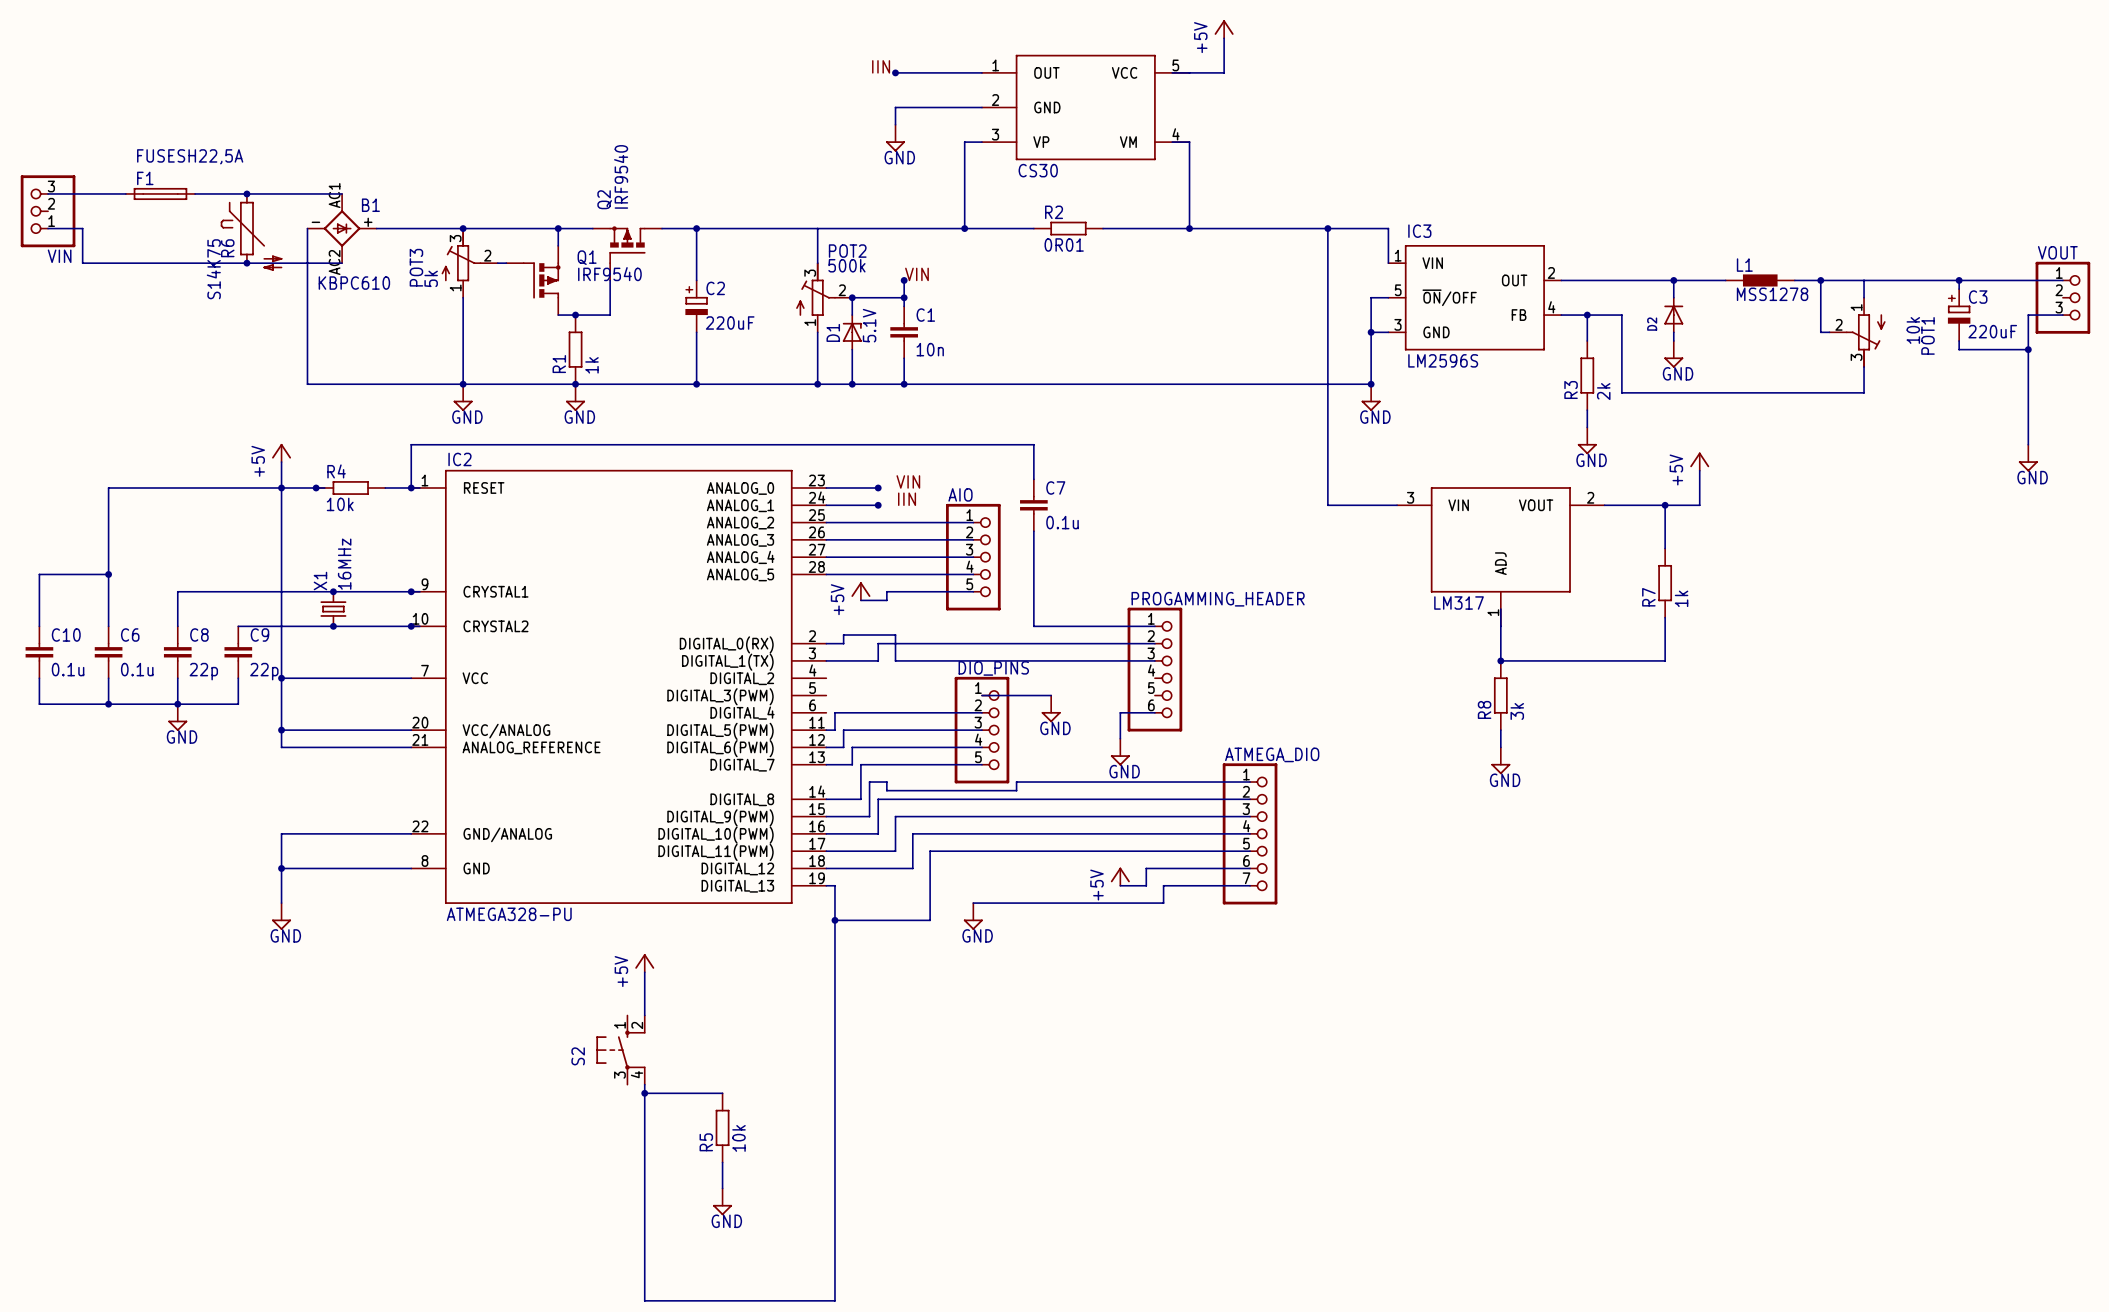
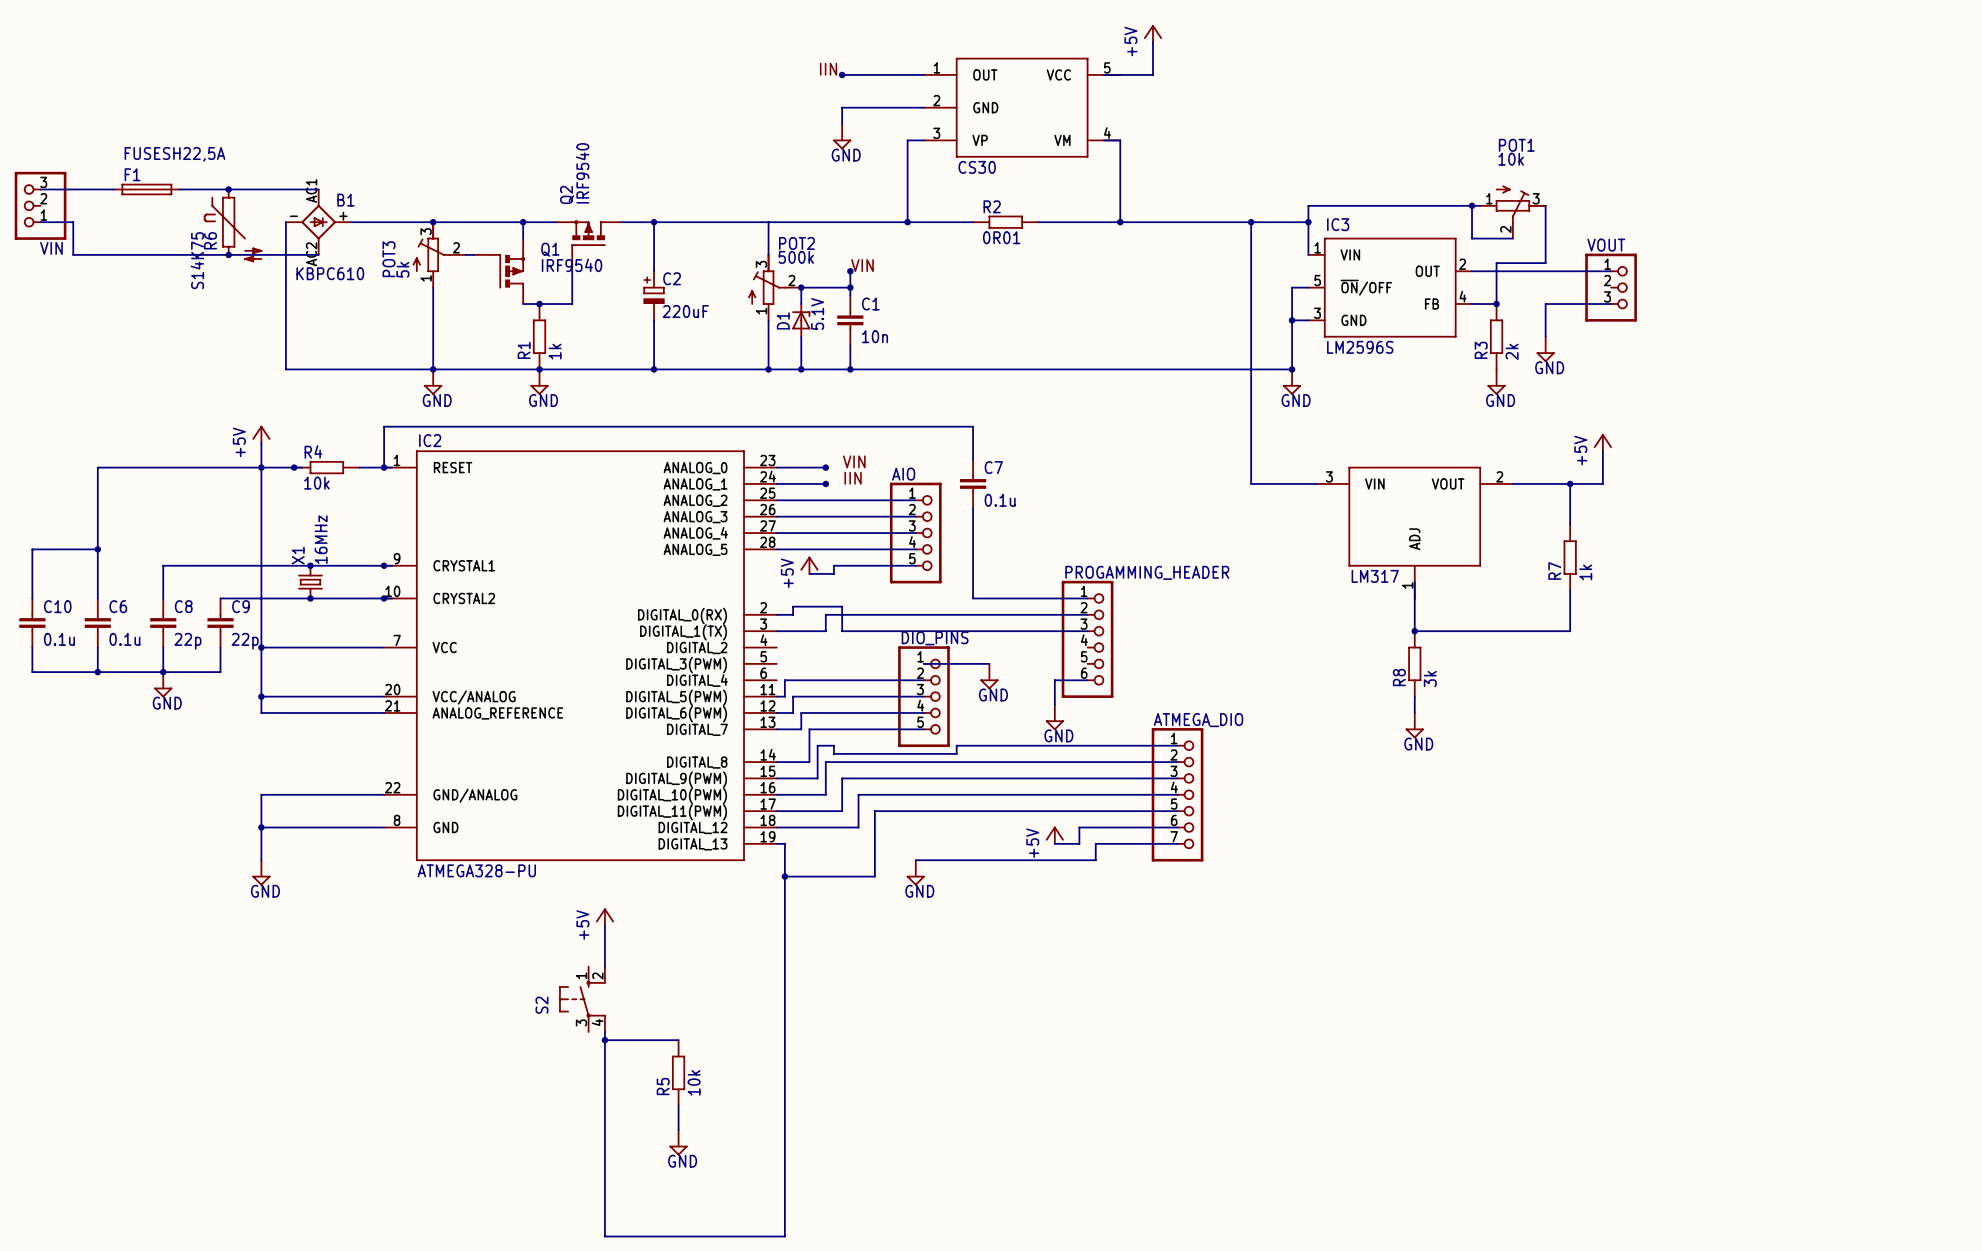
wire: none -> (1472, 205) (1472, 238) (1512, 238)
junction: none -> (1472, 205)
wire: none -> (1480, 205) (1308, 205) (1308, 222)
wire: none -> (1545, 205) (1545, 263) (1496, 263) (1496, 304)
junction: none -> (1308, 222)
wire: (1673, 280) (1673, 297) -> none
junction: (1673, 280) -> none
L1: MSS1278 (1760, 280) -> none
wire: (1794, 280) (2062, 280) -> none
wire: (1820, 280) (1820, 332) (1829, 332) -> none
junction: (1820, 280) -> none
wire: (1864, 280) (1864, 297) -> none
wire: (1959, 280) (1959, 289) -> none
junction: (1959, 280) -> none
VOUT: none -> (1611, 287)
VOUT: (2062, 297) -> none
D2: (1673, 315) -> none
wire: none -> (1611, 304) (1545, 304) (1545, 336)
C3: 220uF (1959, 315) -> none
wire: (2062, 315) (2028, 315) (2028, 444) -> none
wire: (1673, 332) (1673, 340) -> none
POT1 position: (1857, 332) -> (1513, 212)
wire: (1587, 340) (1587, 315) (1621, 315) (1621, 392) (1864, 392) (1864, 366) -> none
POT1 rotation: 0° (1865, 340) -> 90° counterclockwise (1520, 204)
wire: (1959, 340) (1959, 349) (2028, 349) -> none
junction: (2028, 349) -> none
power symbol position: GND (1673, 354) -> GND (1545, 349)
R3 position: (1587, 375) -> (1496, 336)
wire: (1587, 410) (1587, 427) -> none
power symbol position: GND (1587, 440) -> GND (1496, 382)
power symbol: GND (2028, 458) -> none

